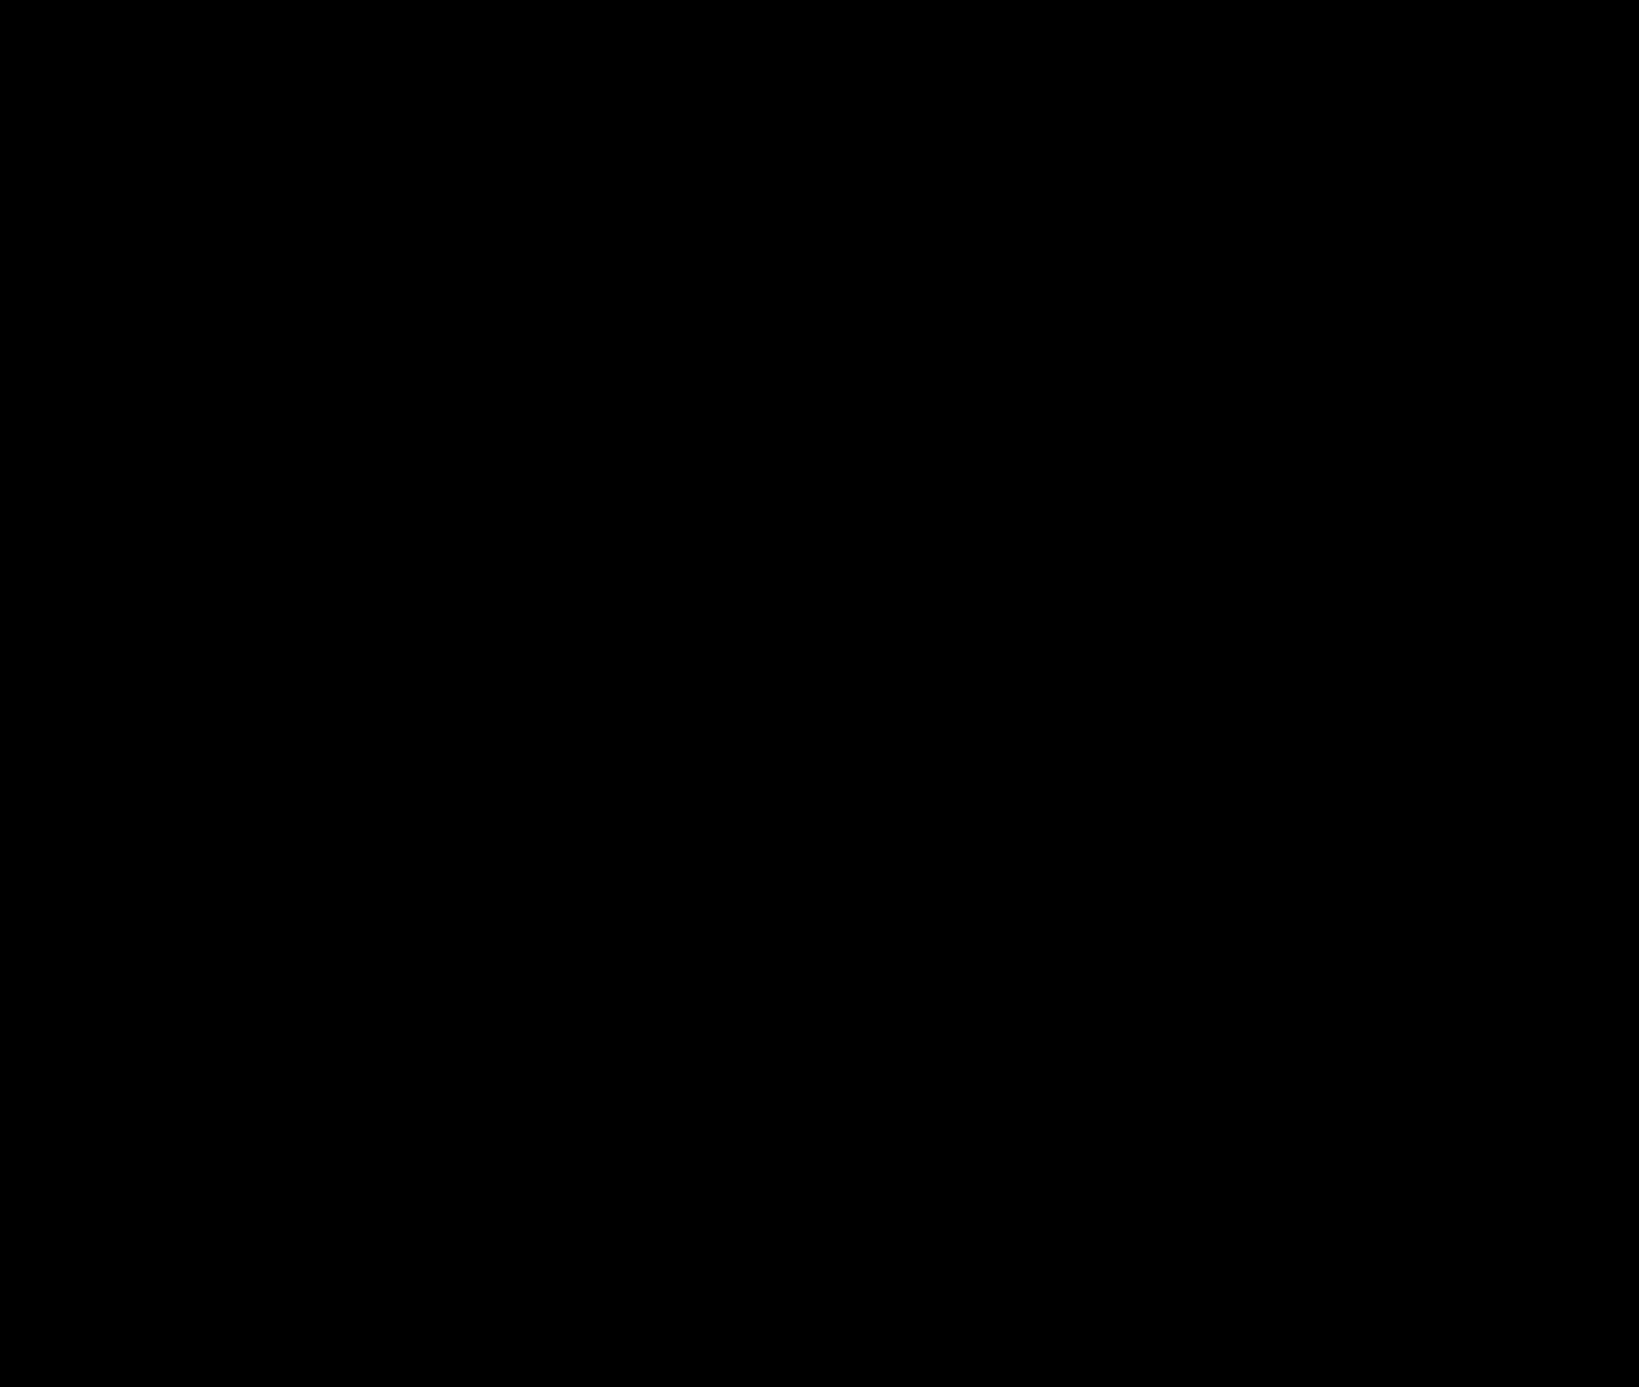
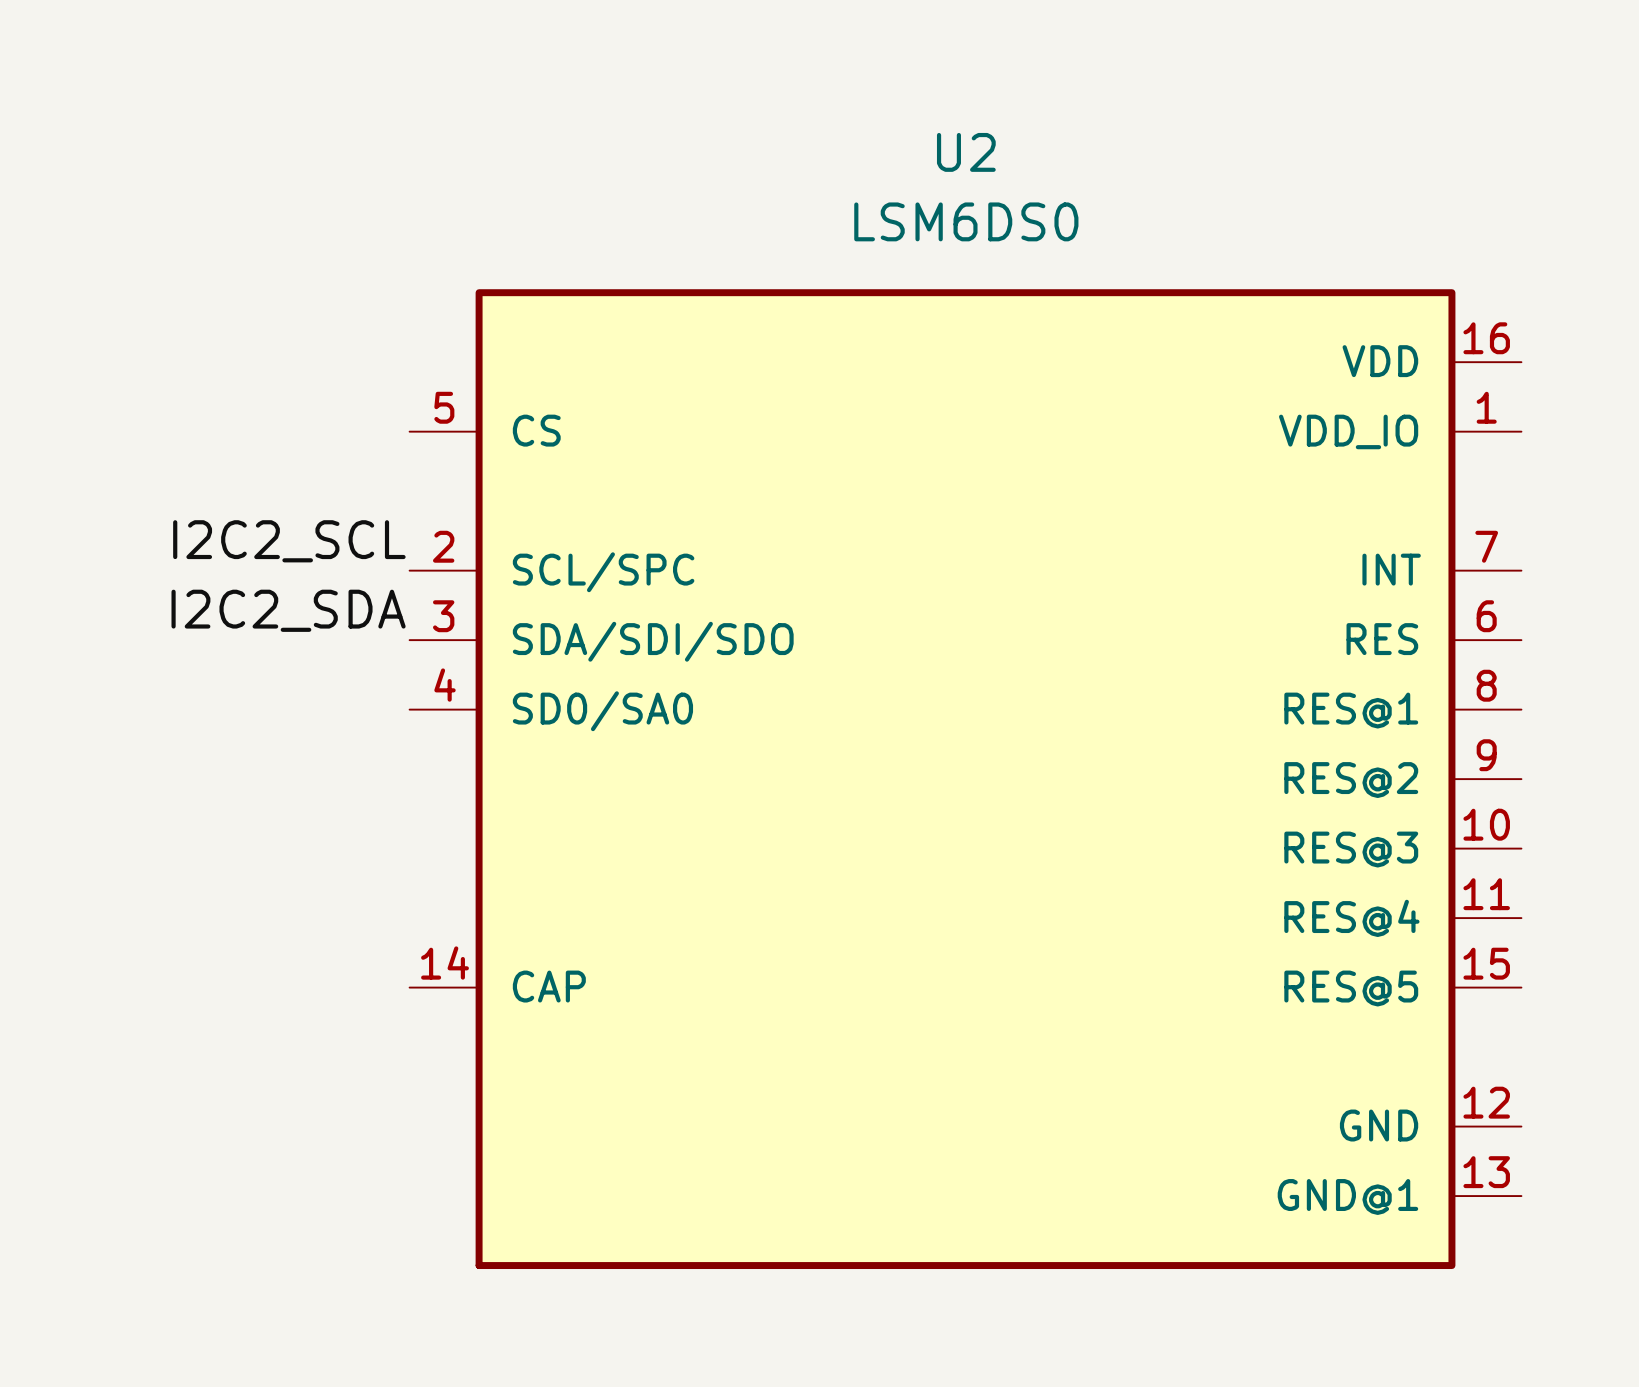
label: none -> I2C2_SCL (289, 541)
label: none -> I2C2_SDA (288, 610)
U2: none -> LSM6DS0 (965, 779)

